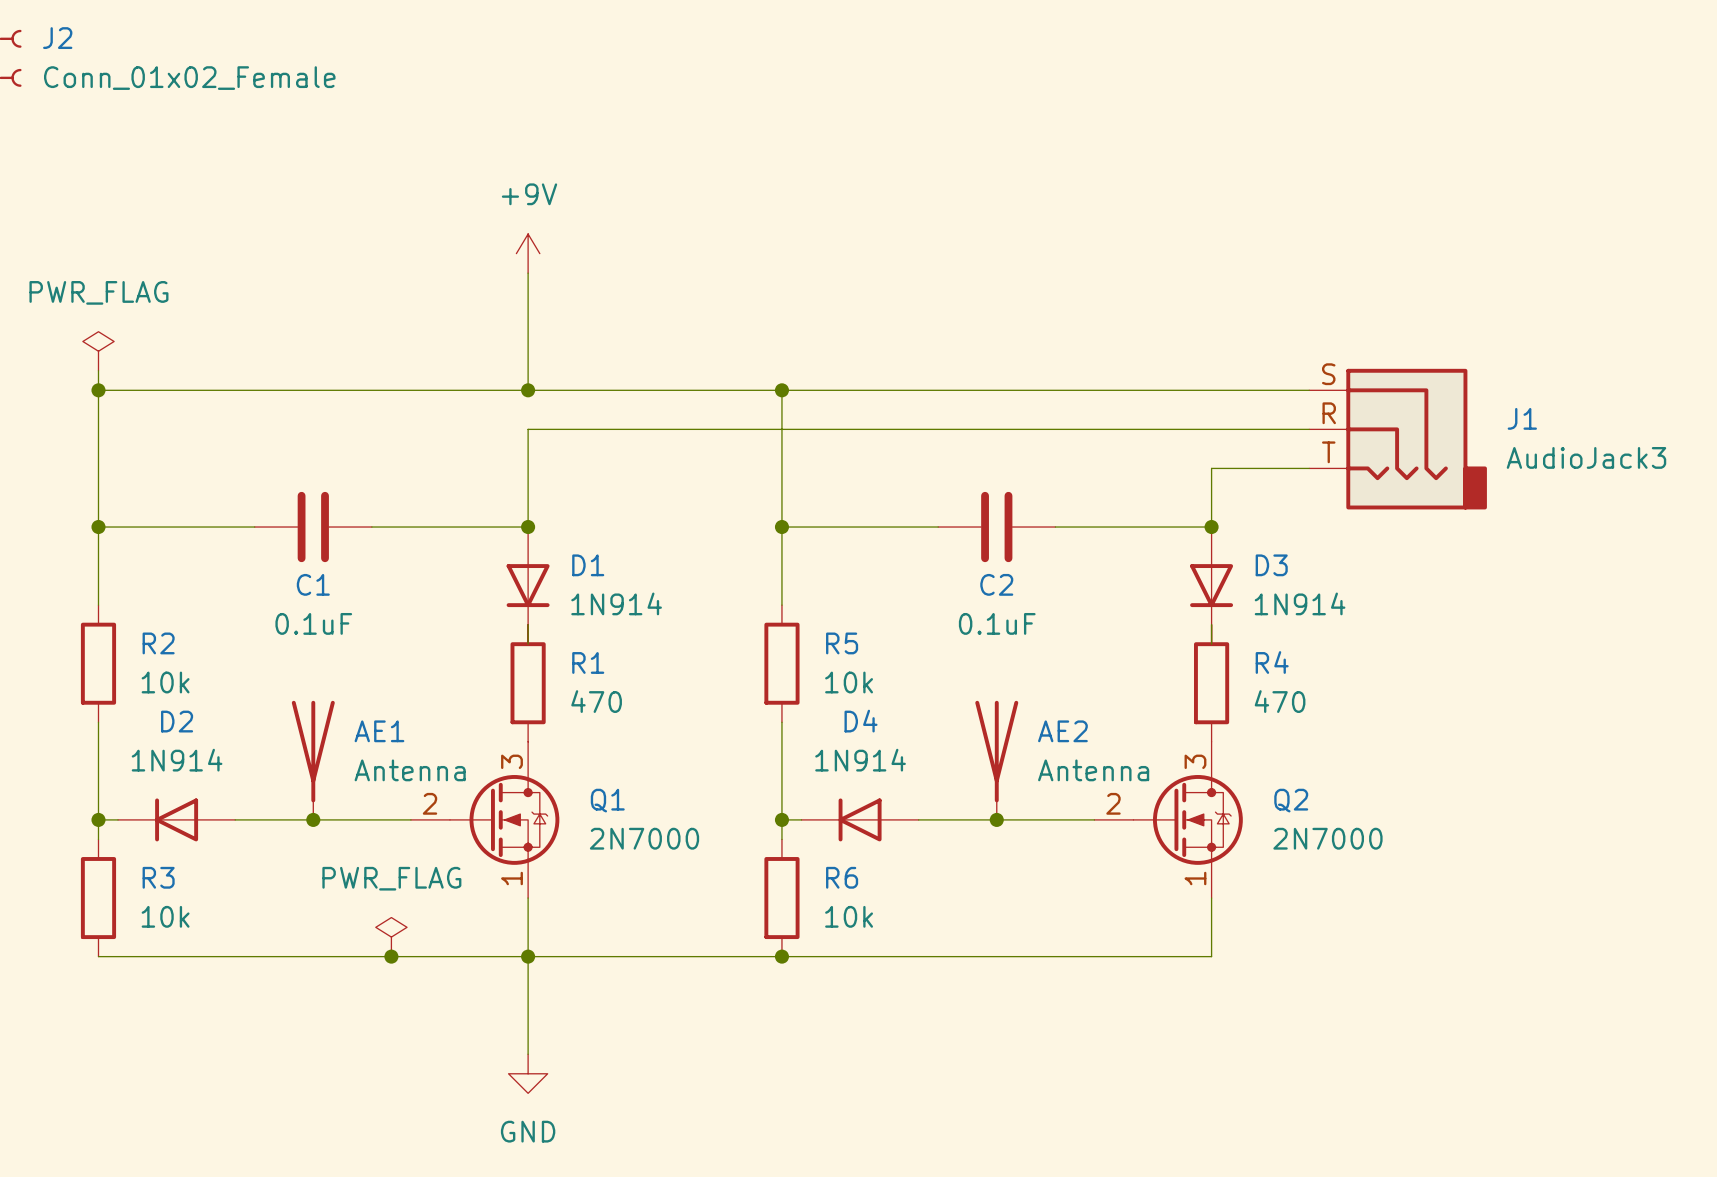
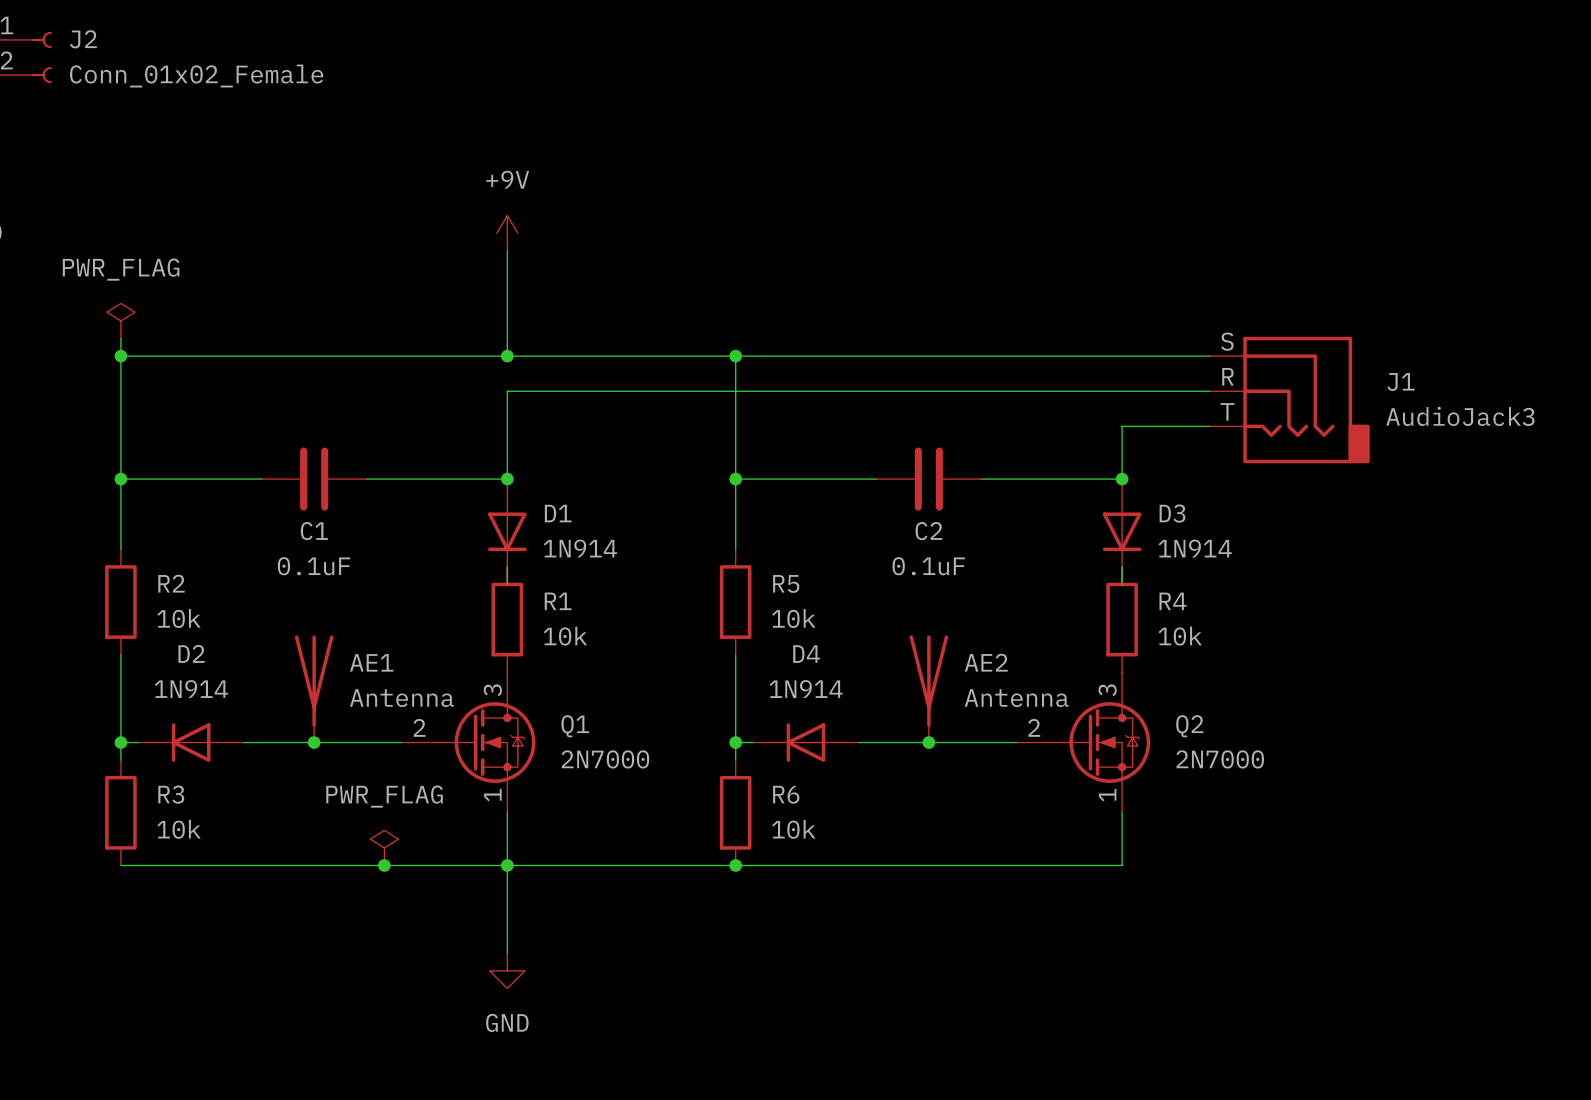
R1 value: 470 (596, 701) -> 10k (565, 636)
R4 value: 470 (1280, 701) -> 10k (1180, 636)

